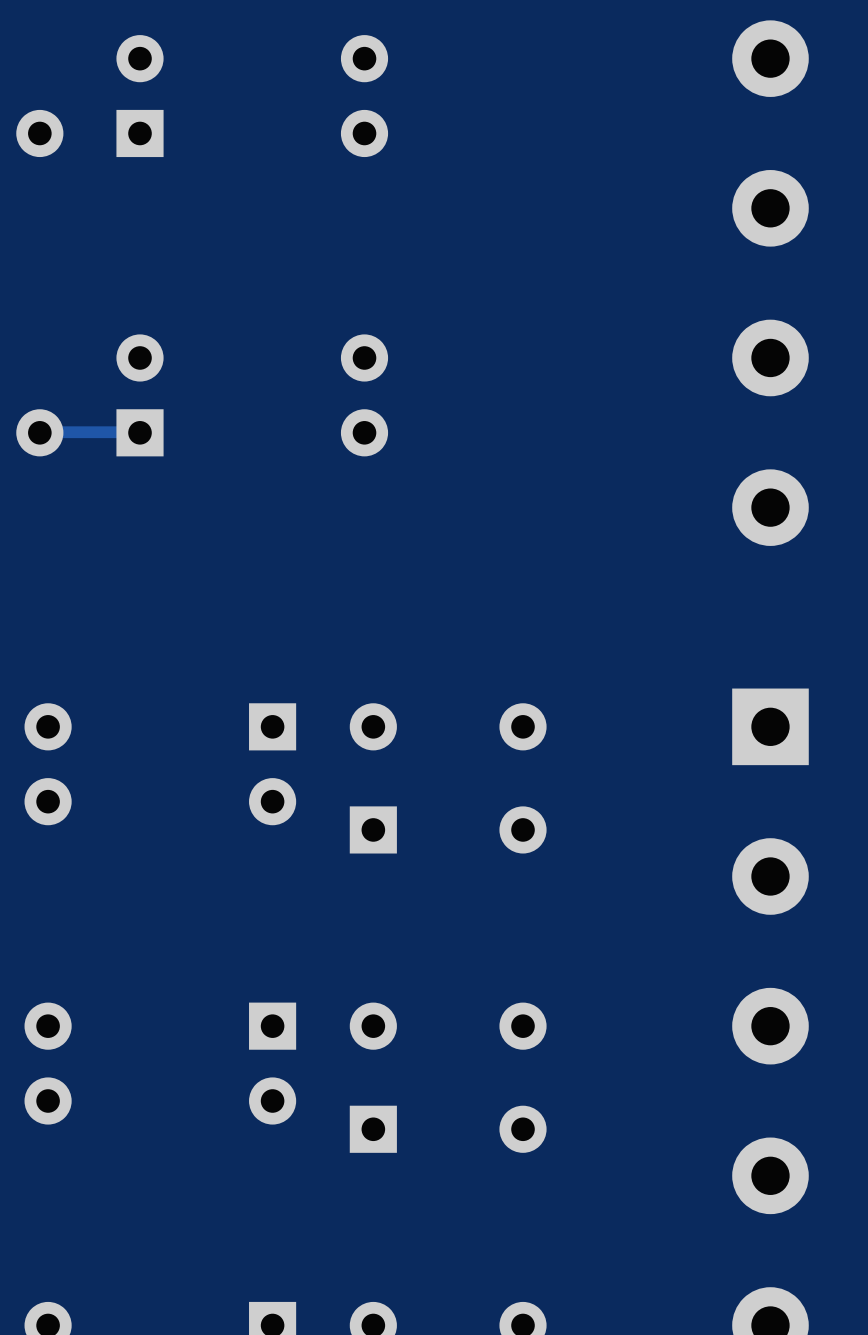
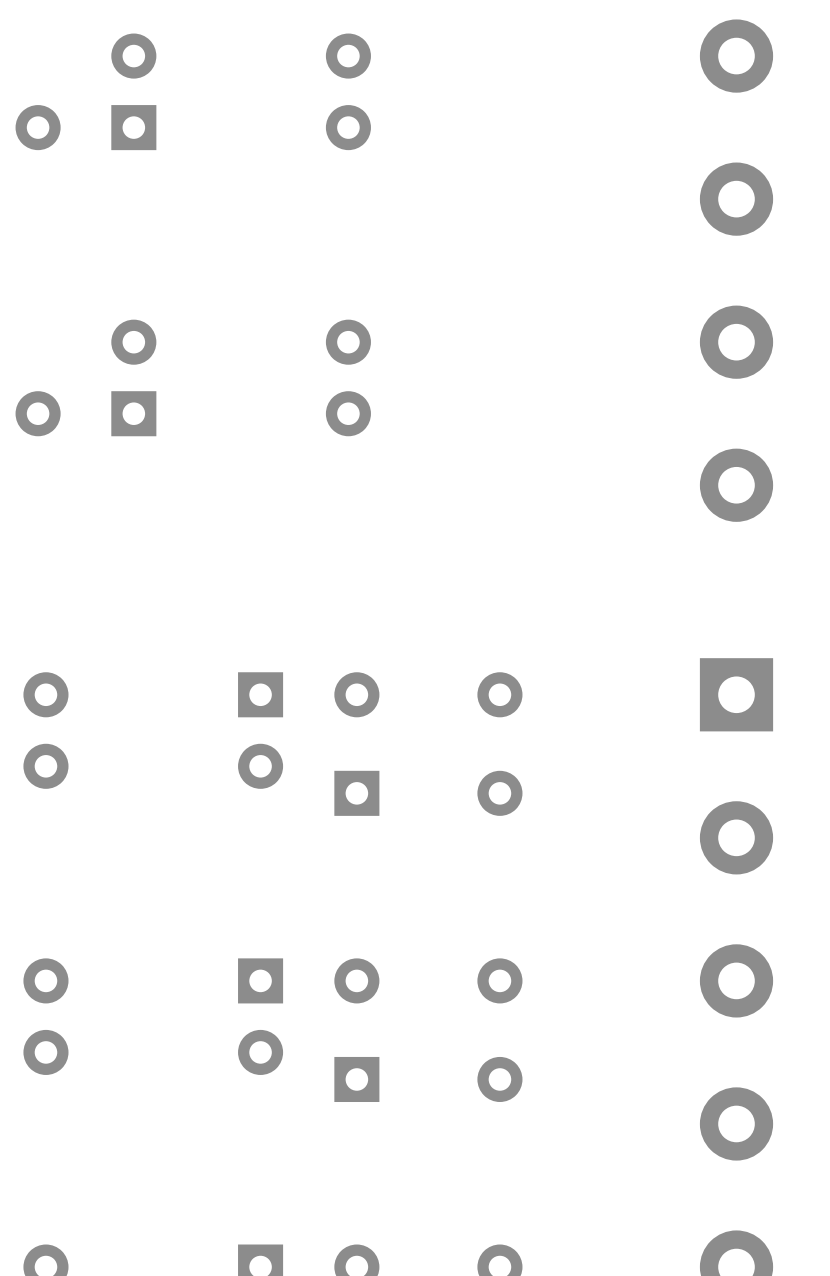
track: (140, 432) (36, 432) -> none

